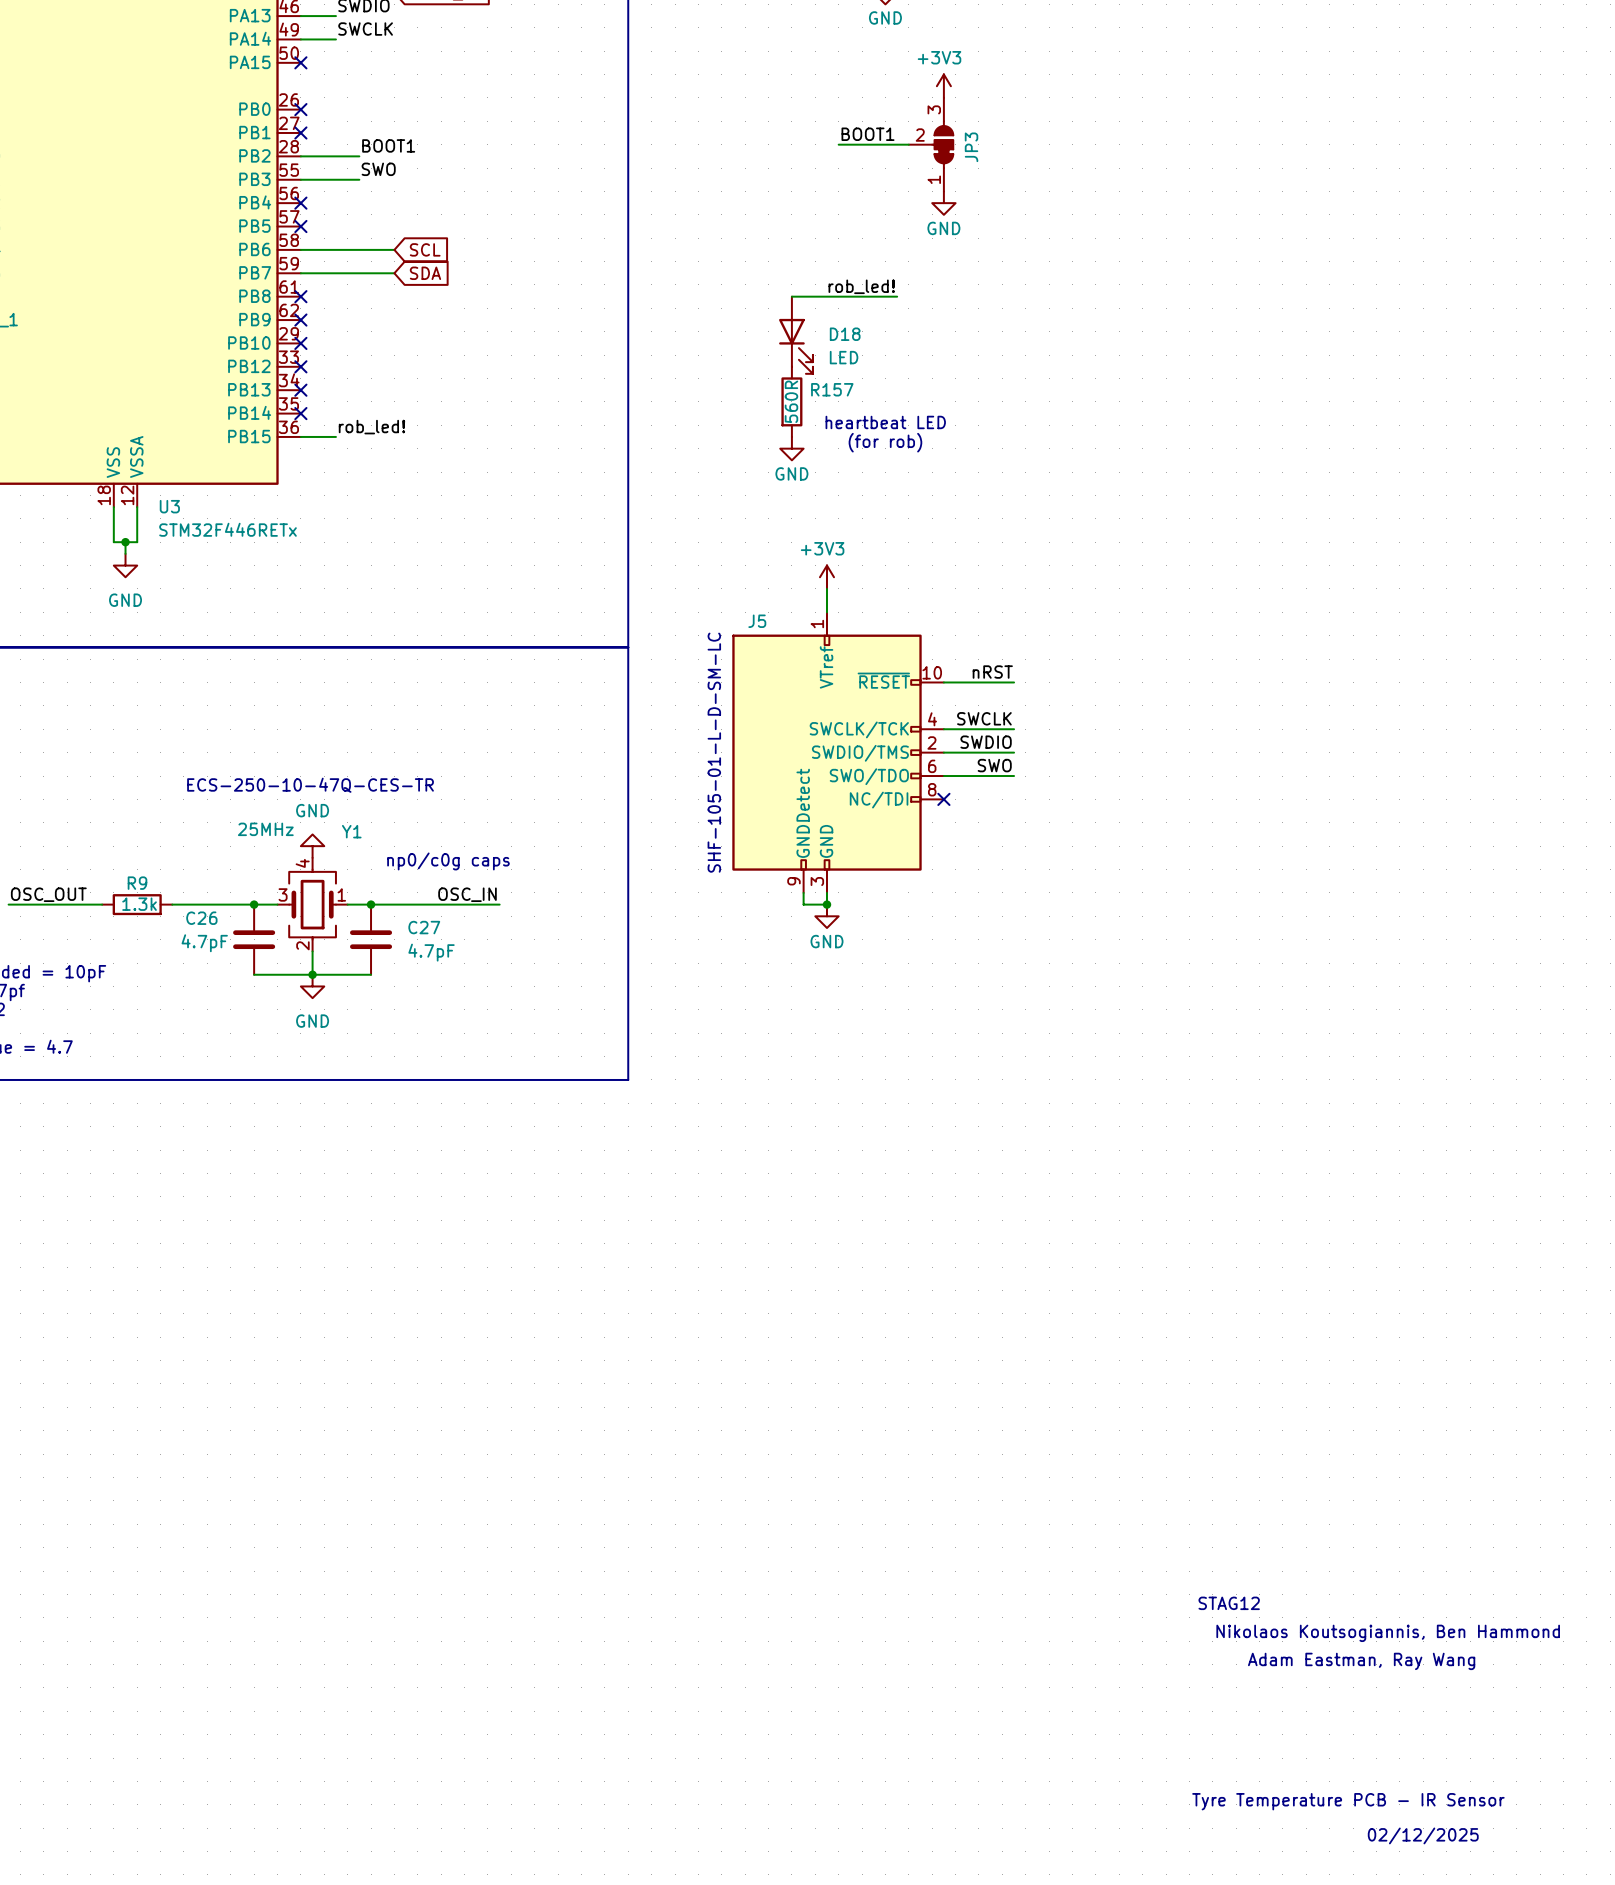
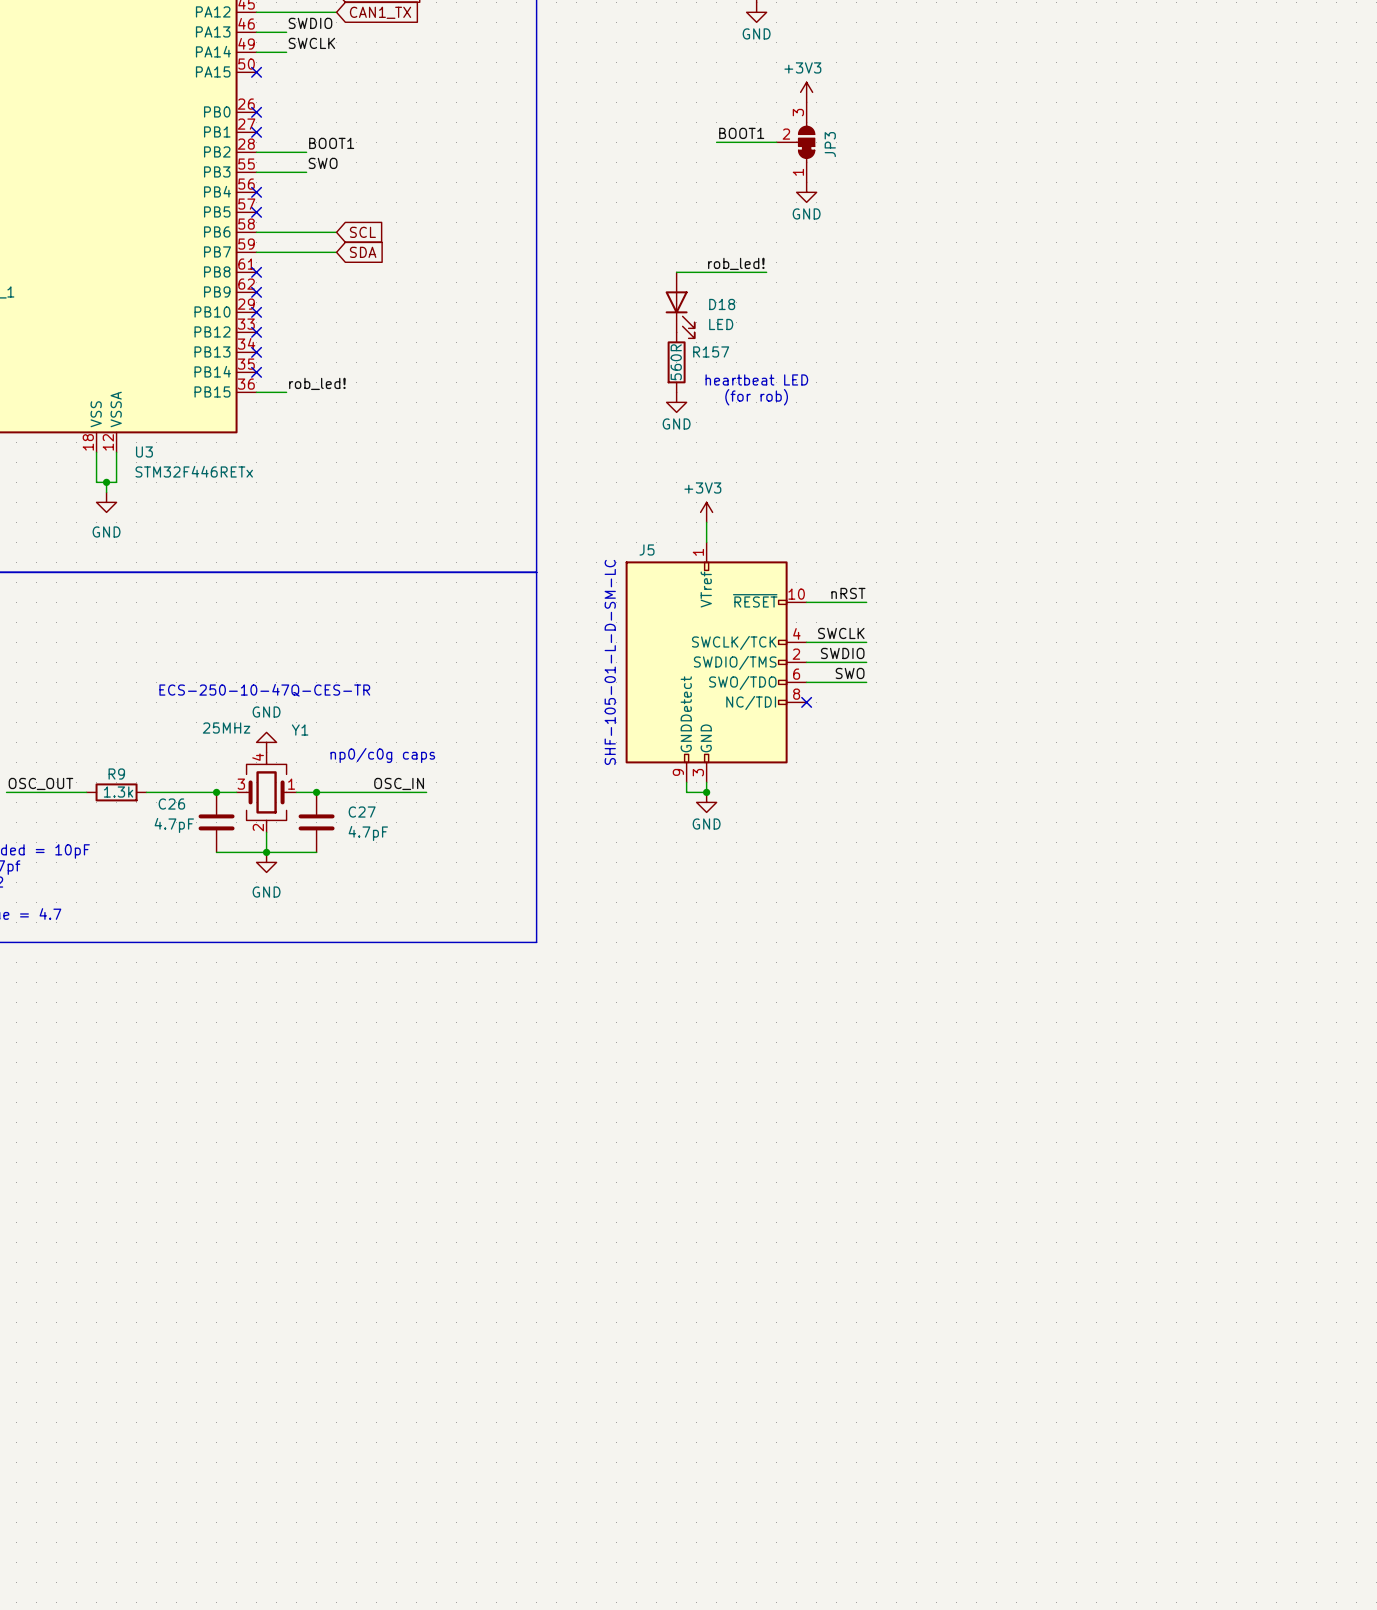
text: STAG12 (1229, 1603) -> none
text: Nikolaos Koutsogiannis, Ben Hammond (1388, 1633) -> none
text: Adam Eastman, Ray Wang (1361, 1661) -> none
text: Tyre Temperature PCB - IR Sensor (1348, 1801) -> none
text: 02/12/2025 (1423, 1835) -> none

